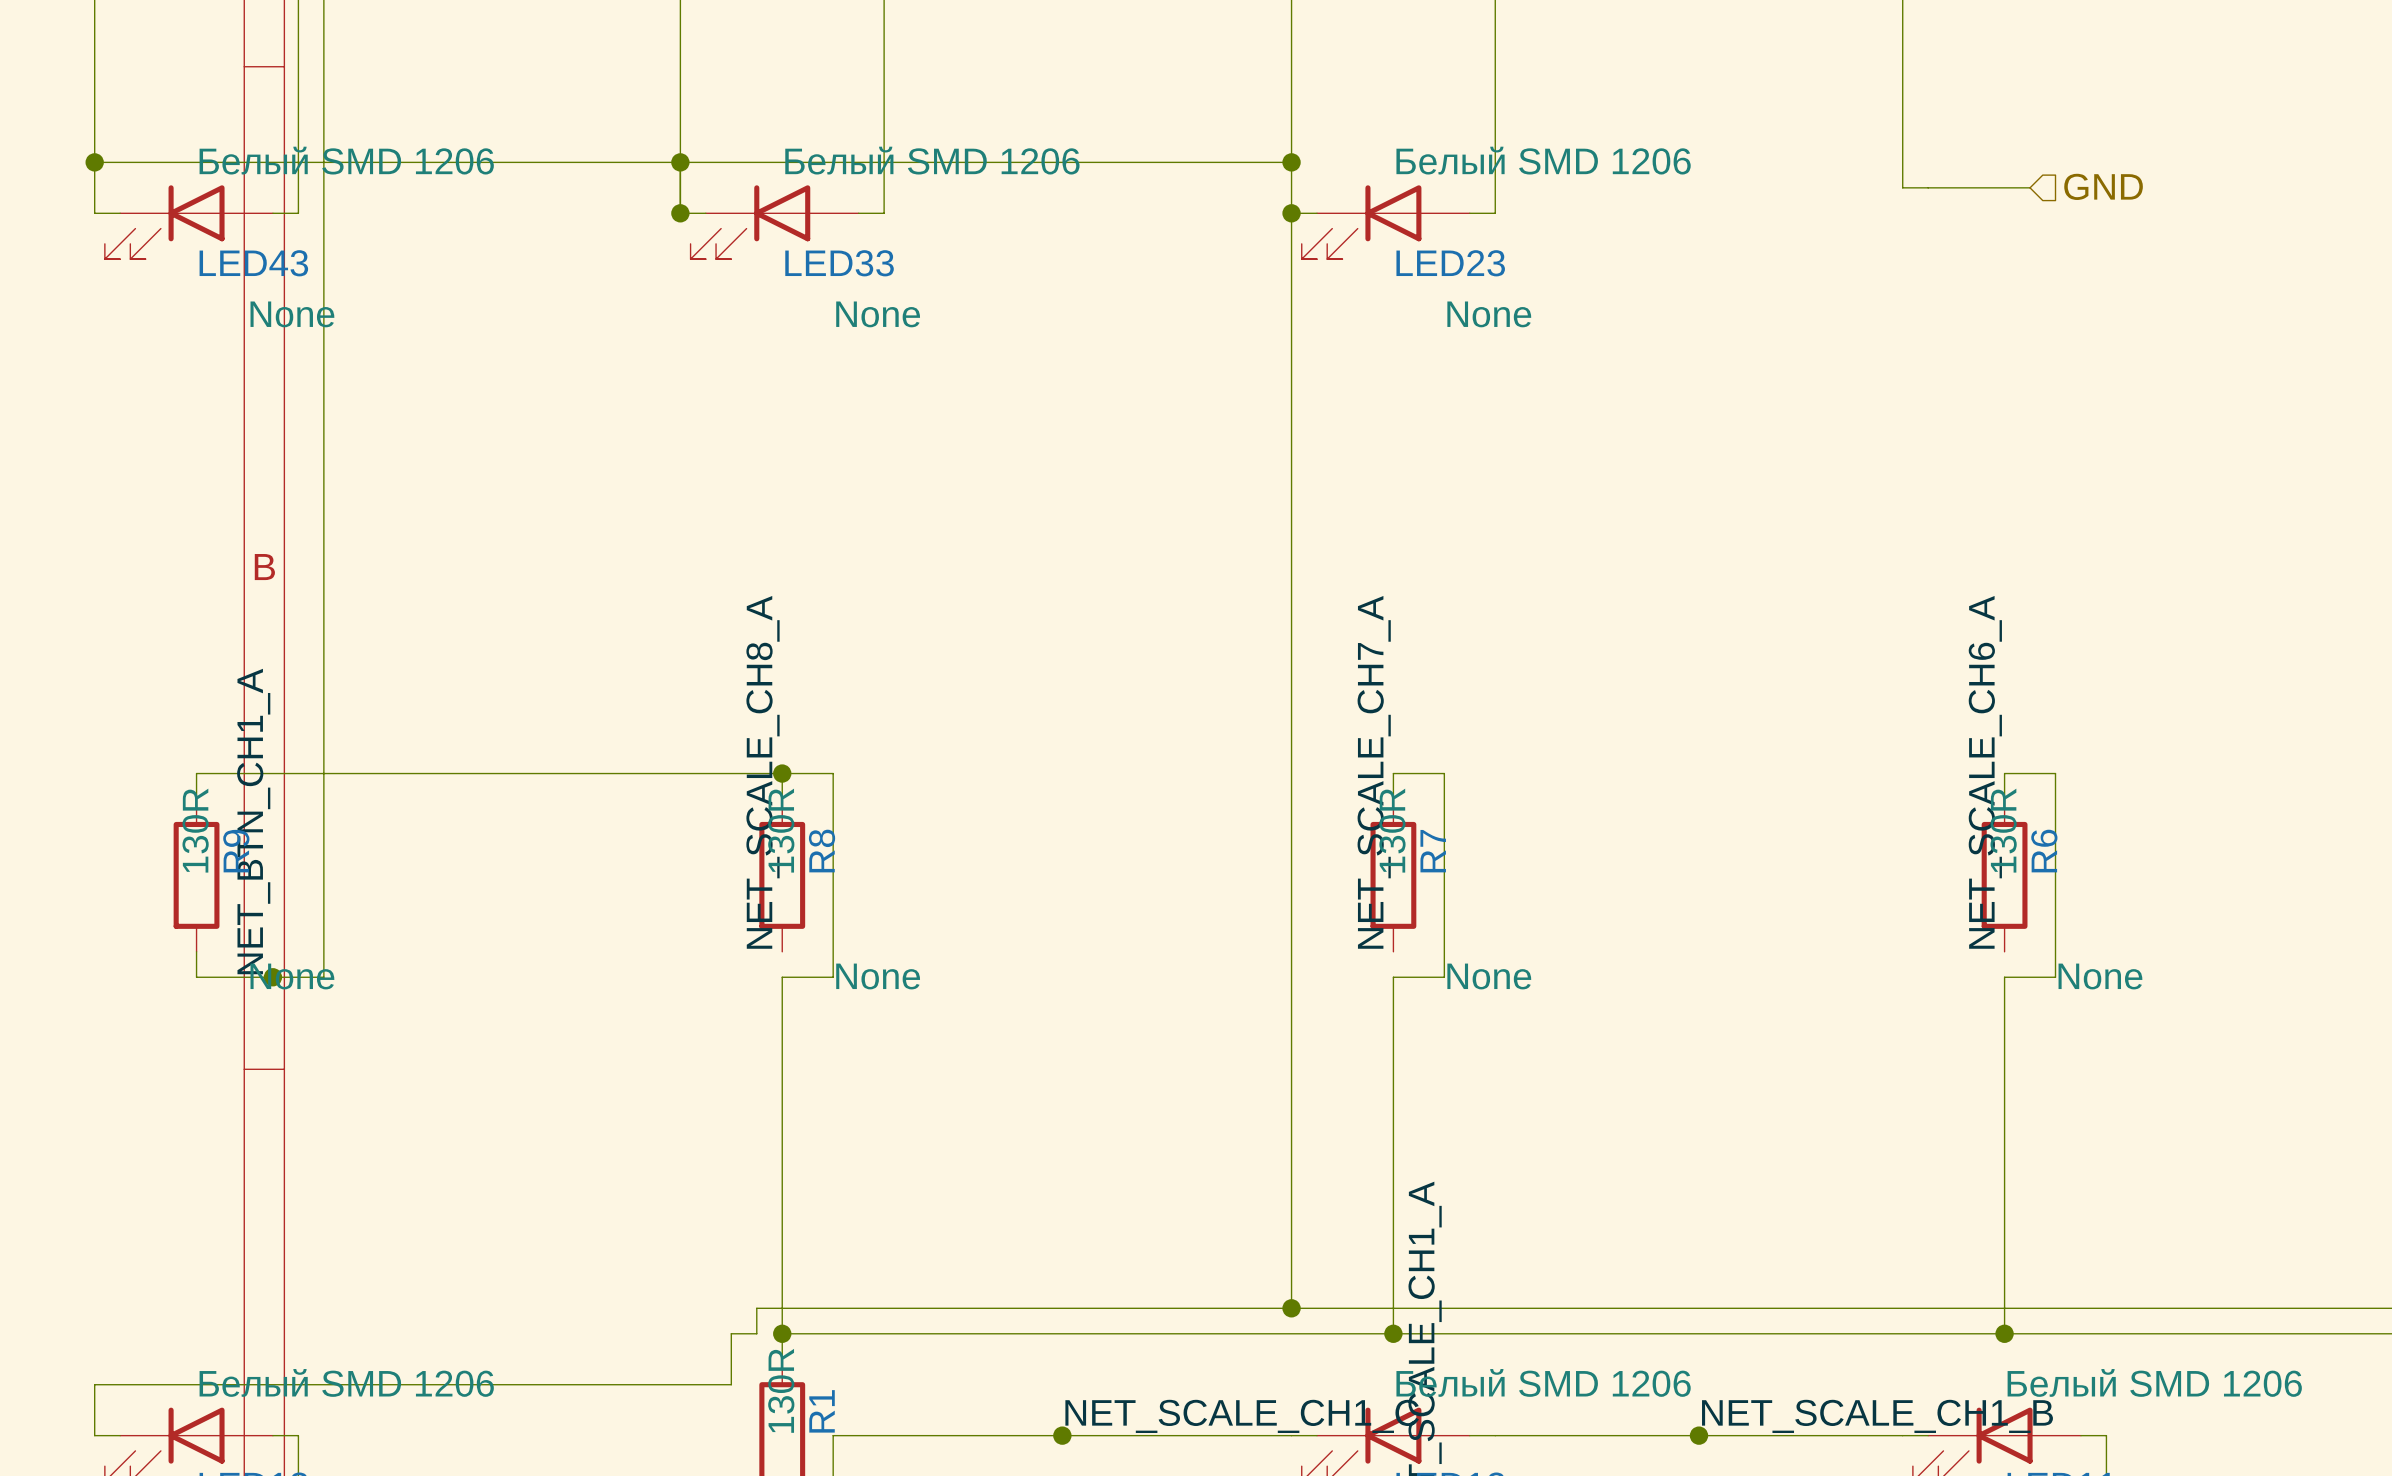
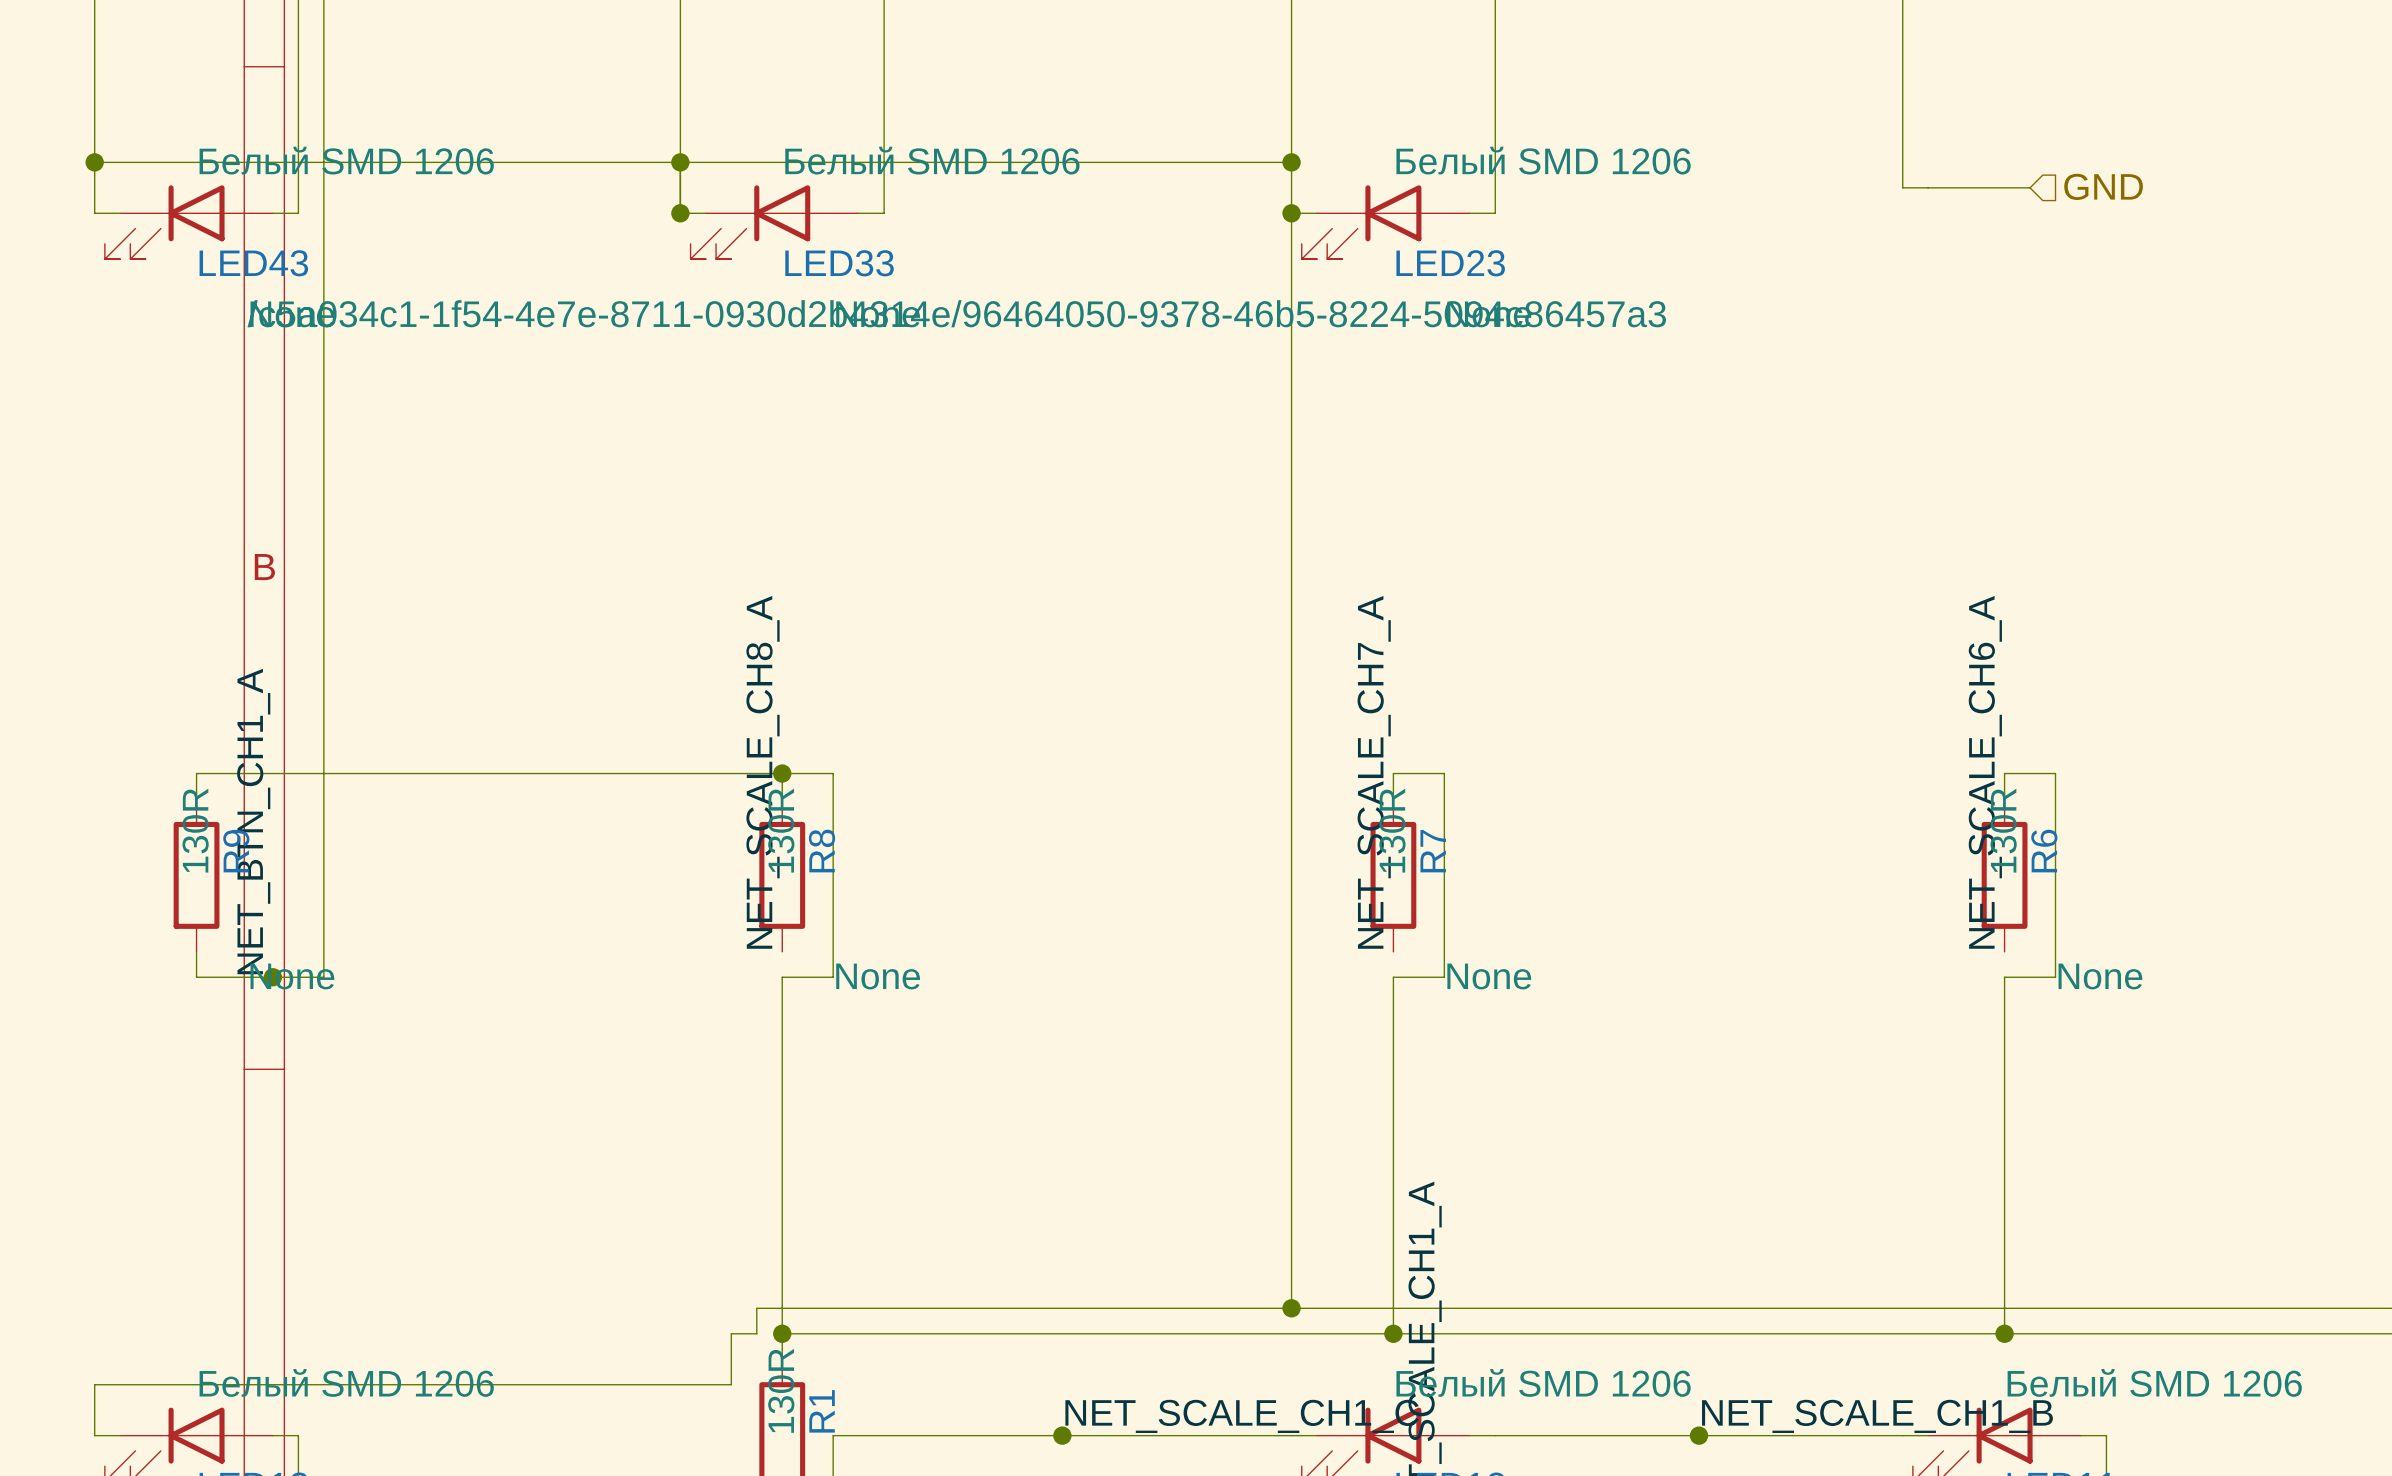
LED43 text: none -> /c5a034c1-1f54-4e7e-8711-0930d2b4314e/96464050-9378-46b5-8224-5094c86457a3 (956, 313)

